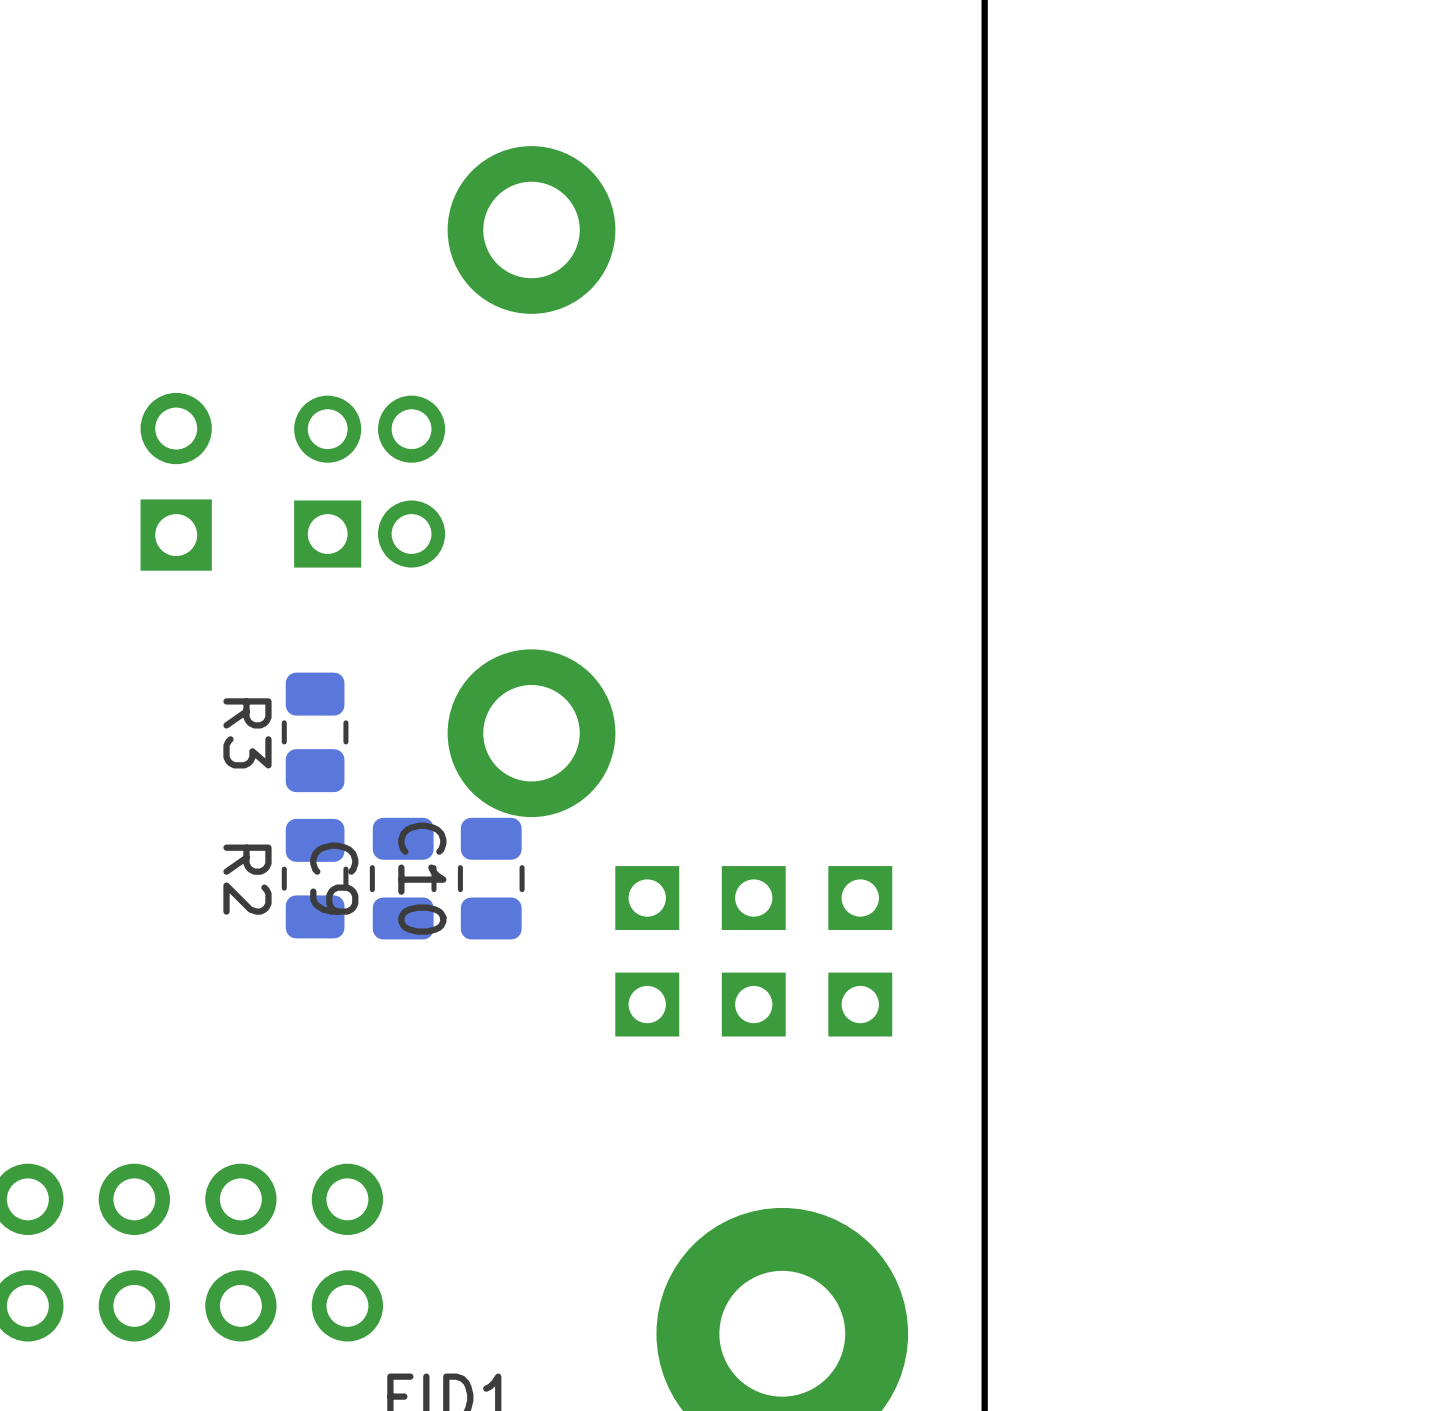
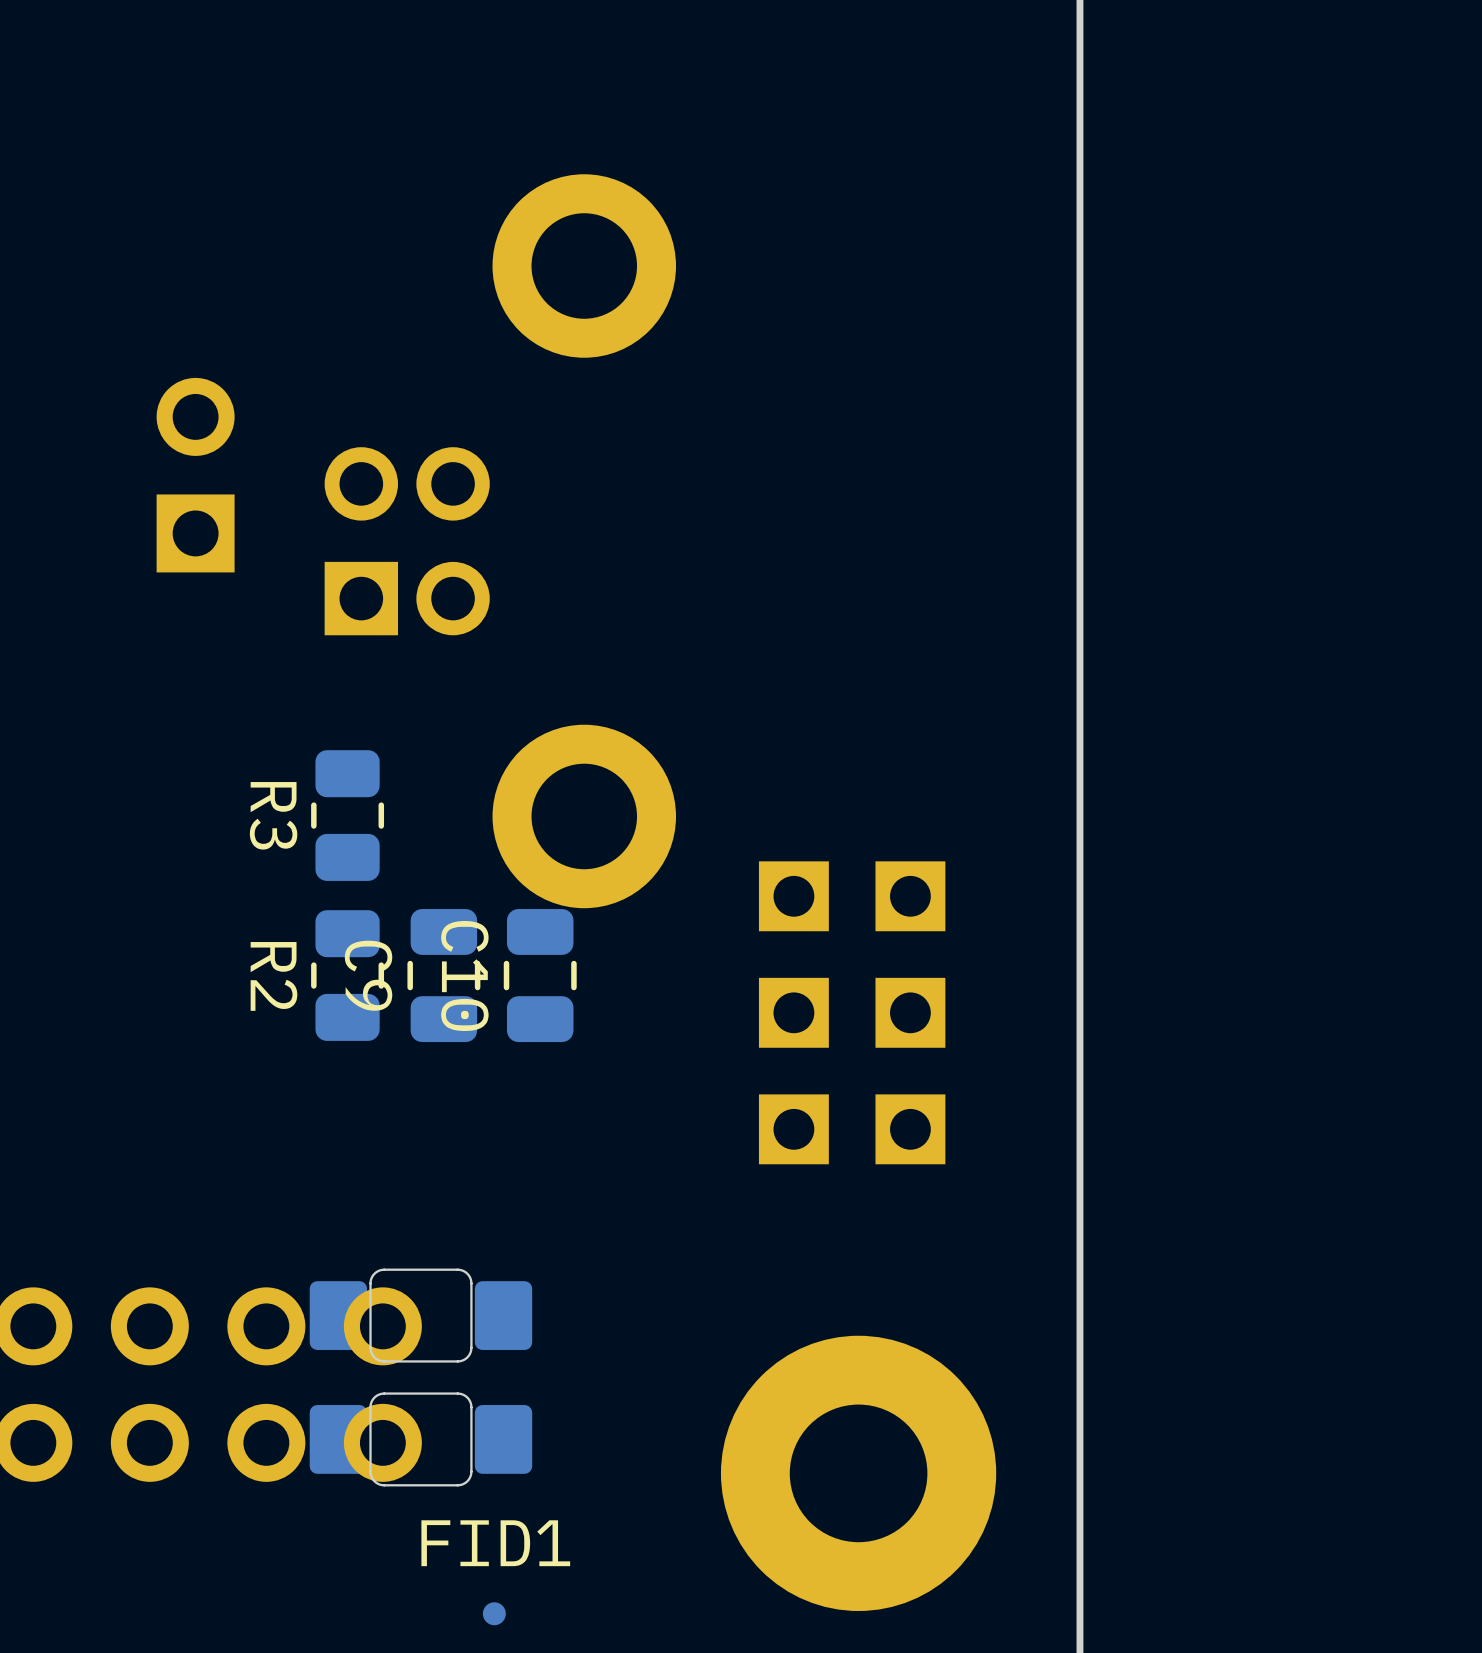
part position: (176, 481) -> (195, 475)
part rotation: 0° (753, 951) -> 90° clockwise (852, 1012)
part: none -> (420, 1315)
part: none -> (420, 1439)

